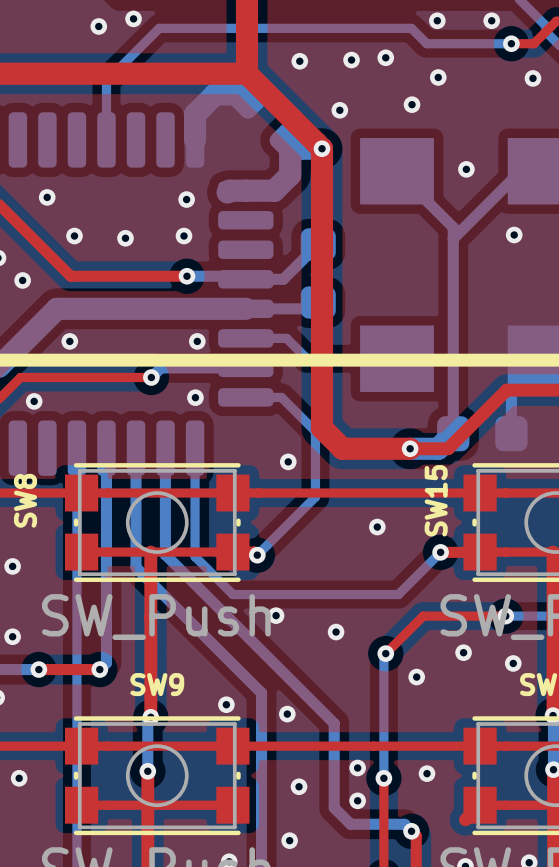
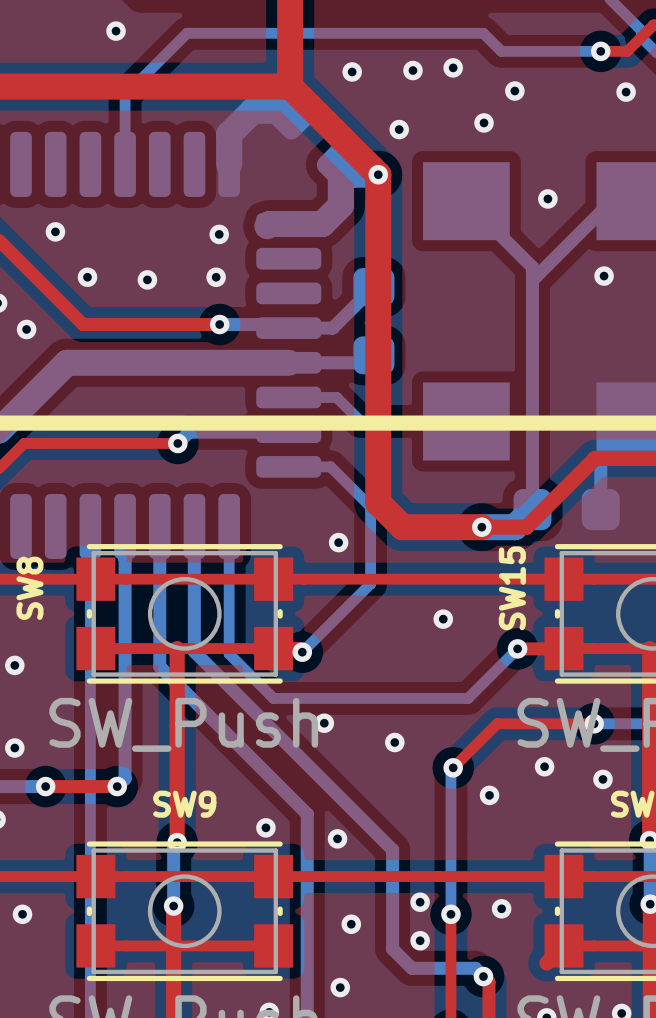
via: (133, 18) -> none
via: (437, 20) -> none
via: (491, 20) -> none
via: (69, 341) -> none
via: (197, 341) -> none
via: (195, 397) -> none
via: (34, 401) -> none

